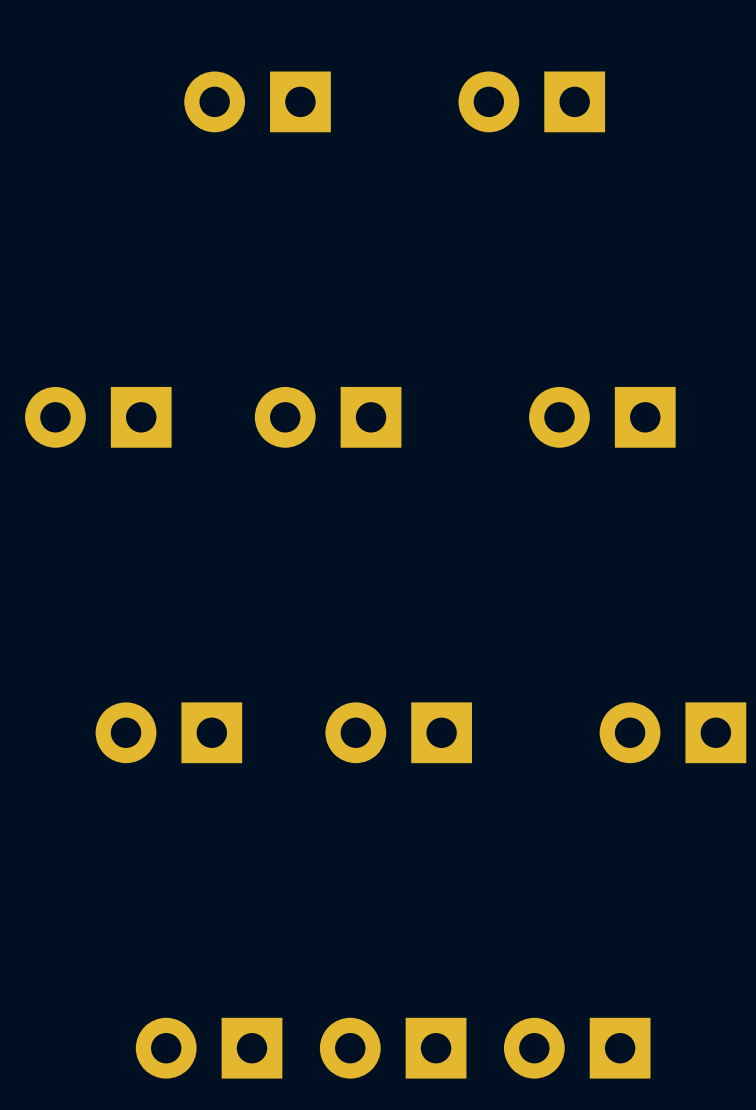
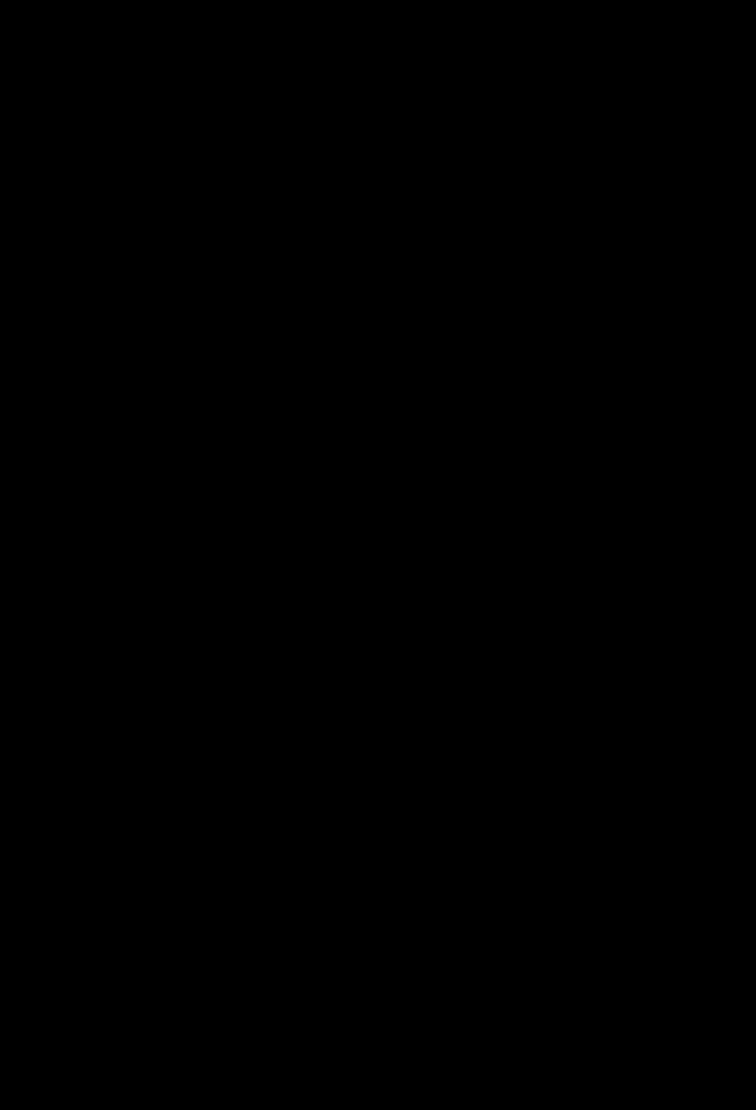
part: (257, 101) -> none
part: (531, 101) -> none
part: (98, 417) -> none
part: (328, 417) -> none
part: (602, 417) -> none
part: (168, 732) -> none
part: (398, 732) -> none
part: (672, 732) -> none
part: (209, 1048) -> none
part: (393, 1048) -> none
part: (577, 1048) -> none

